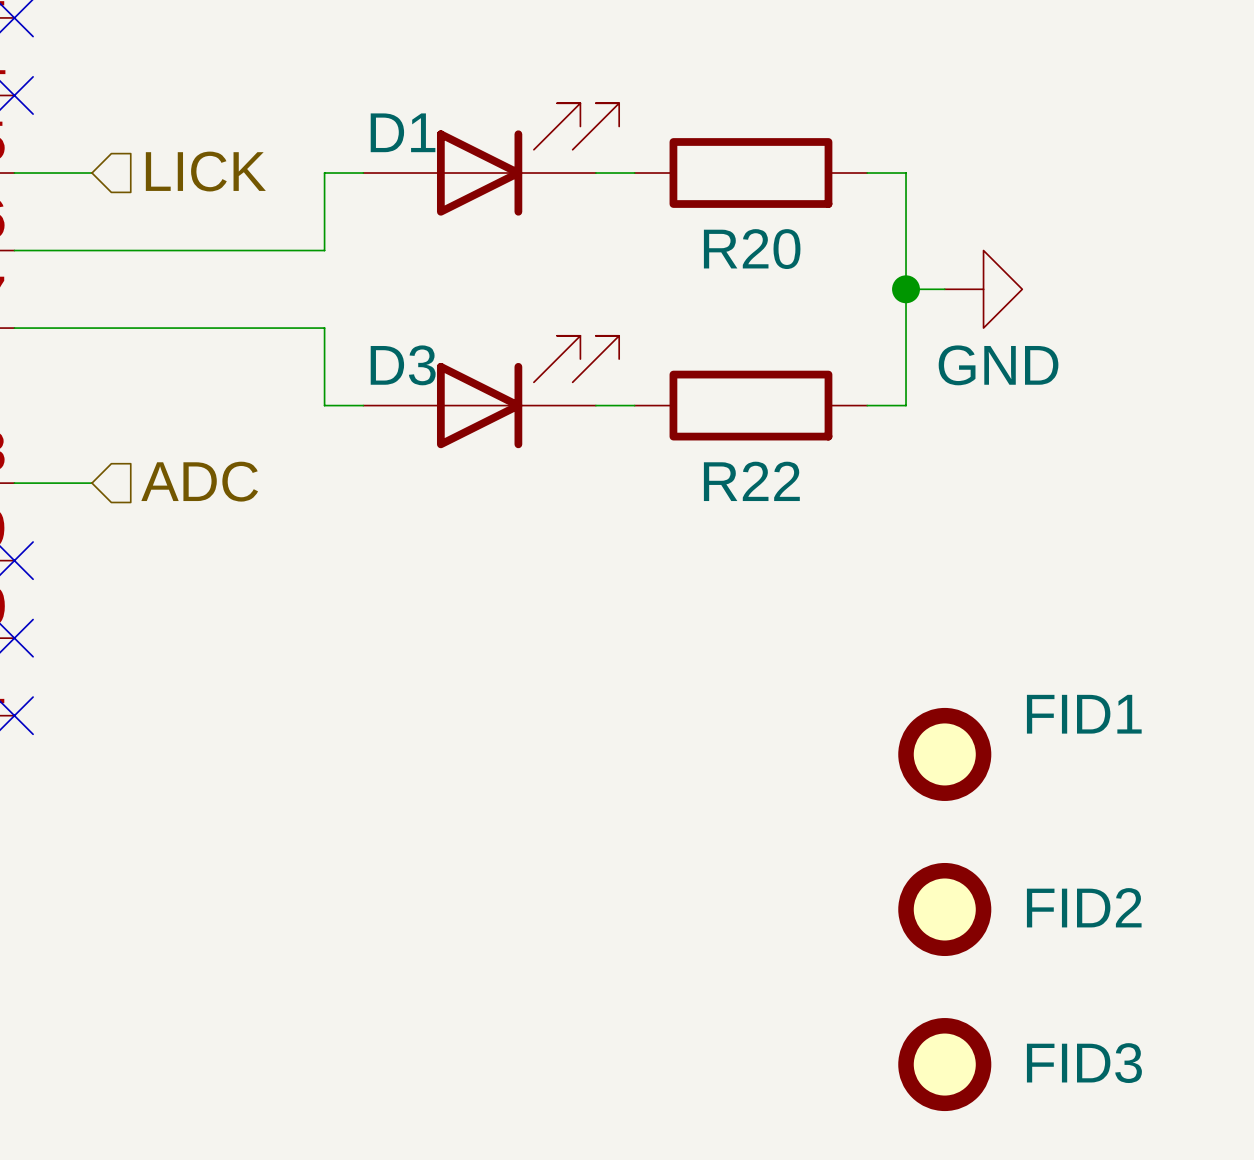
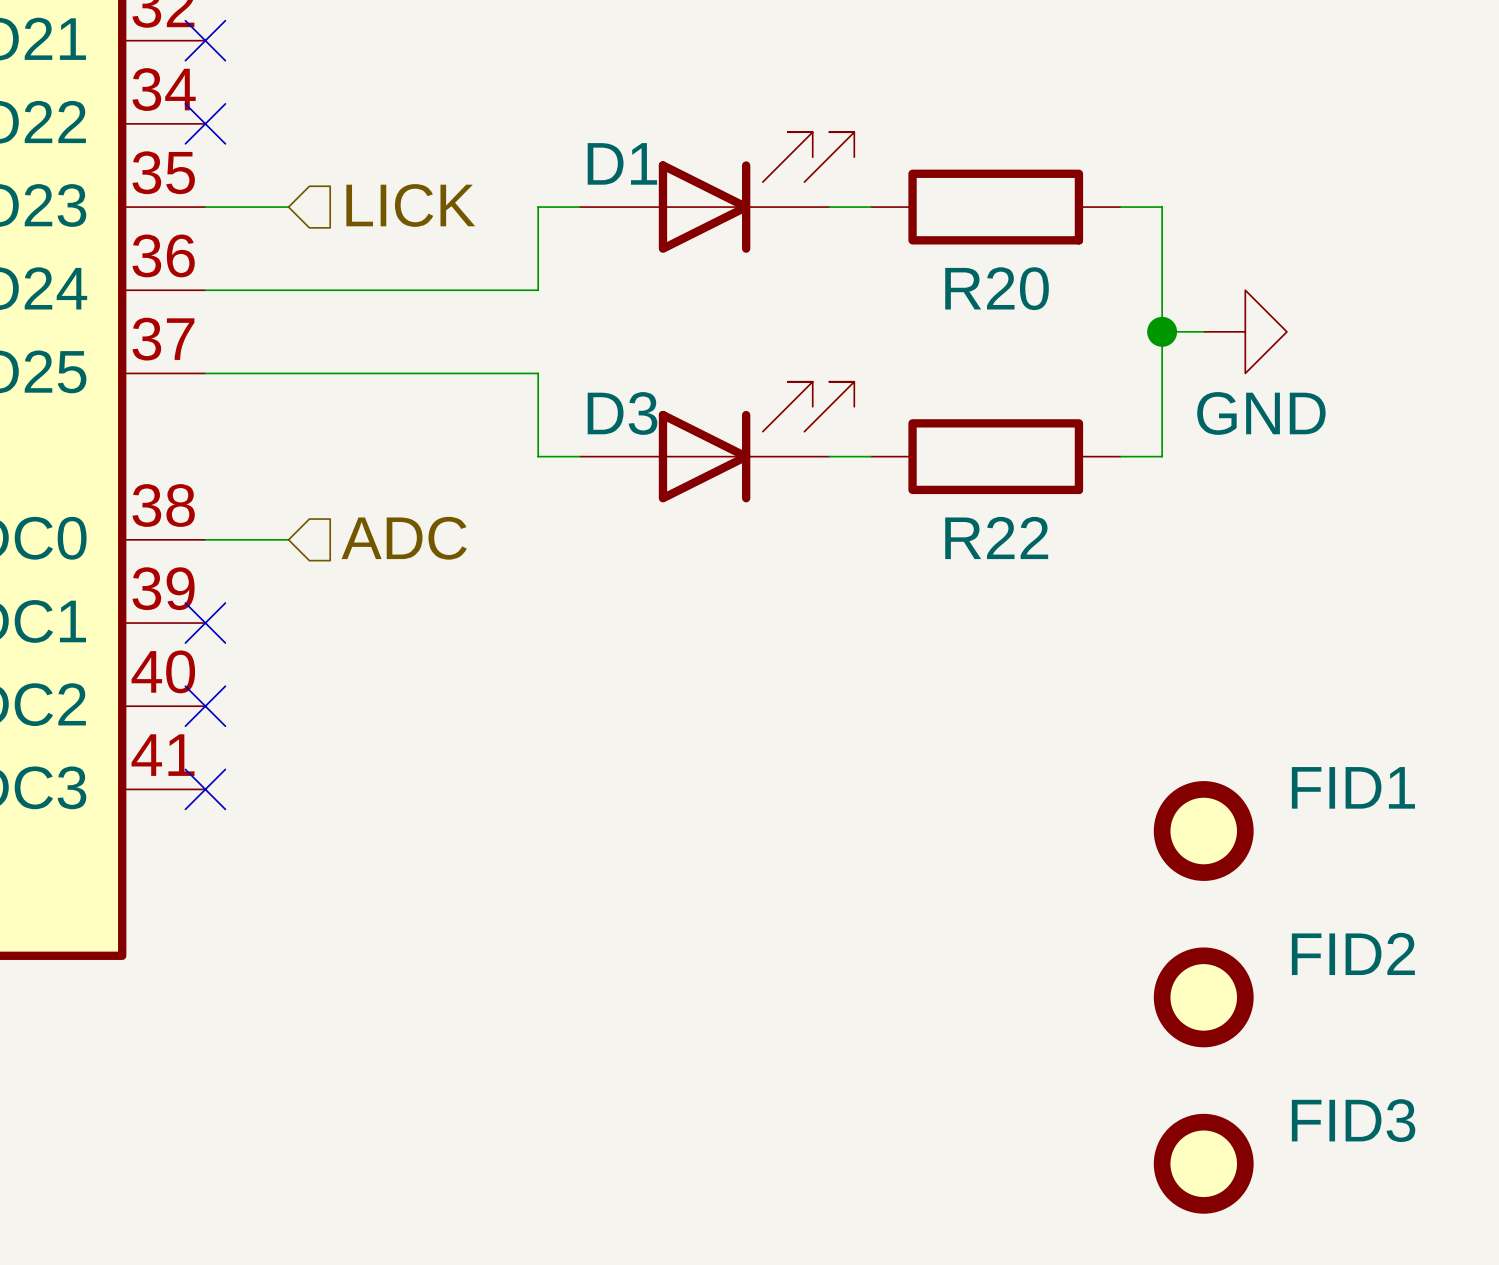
FID2 name position: FID2 (1084, 907) -> FID2 (1353, 953)
FID3 name position: FID3 (1084, 1063) -> FID3 (1353, 1120)

